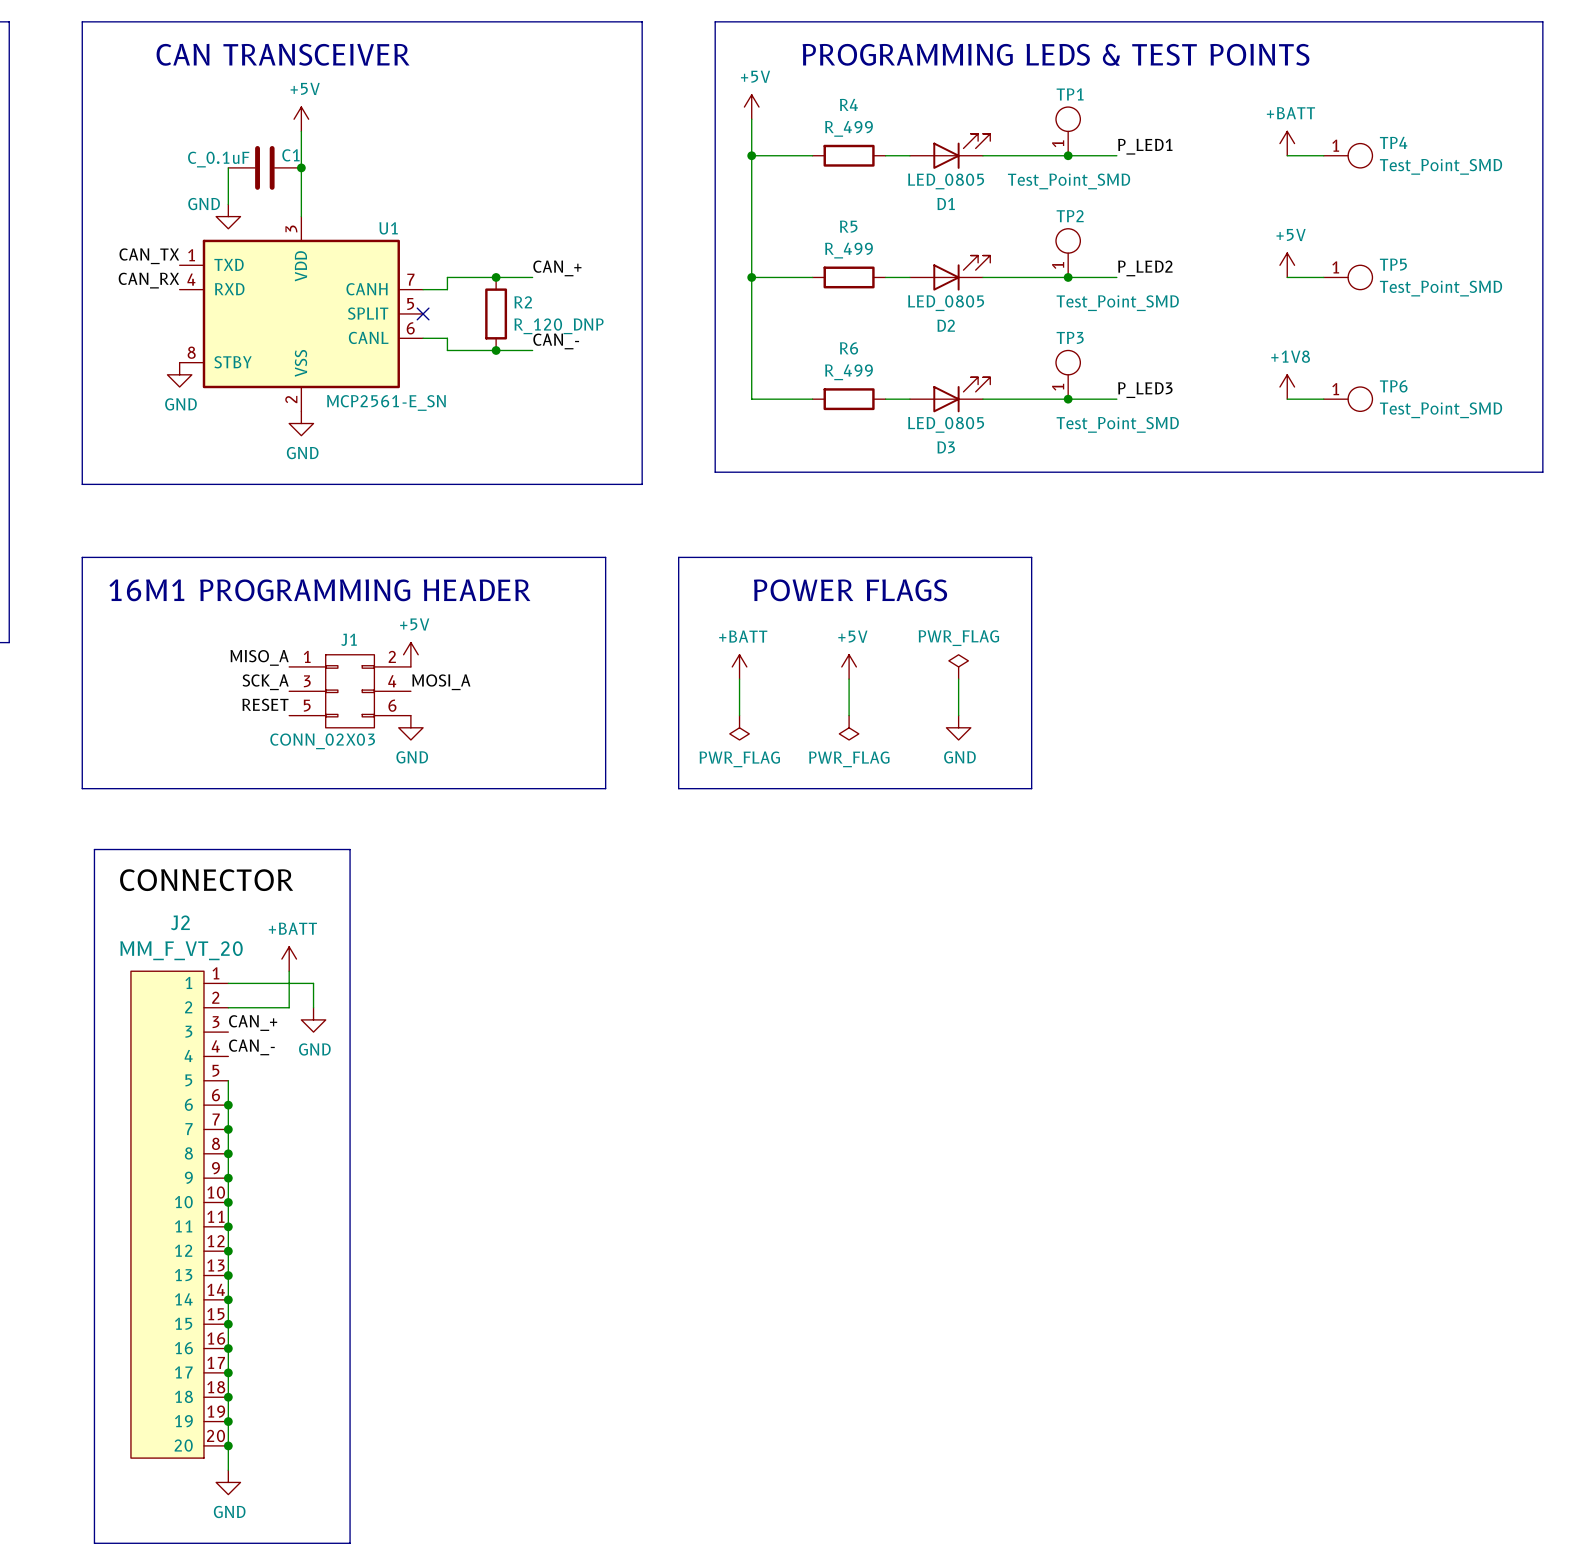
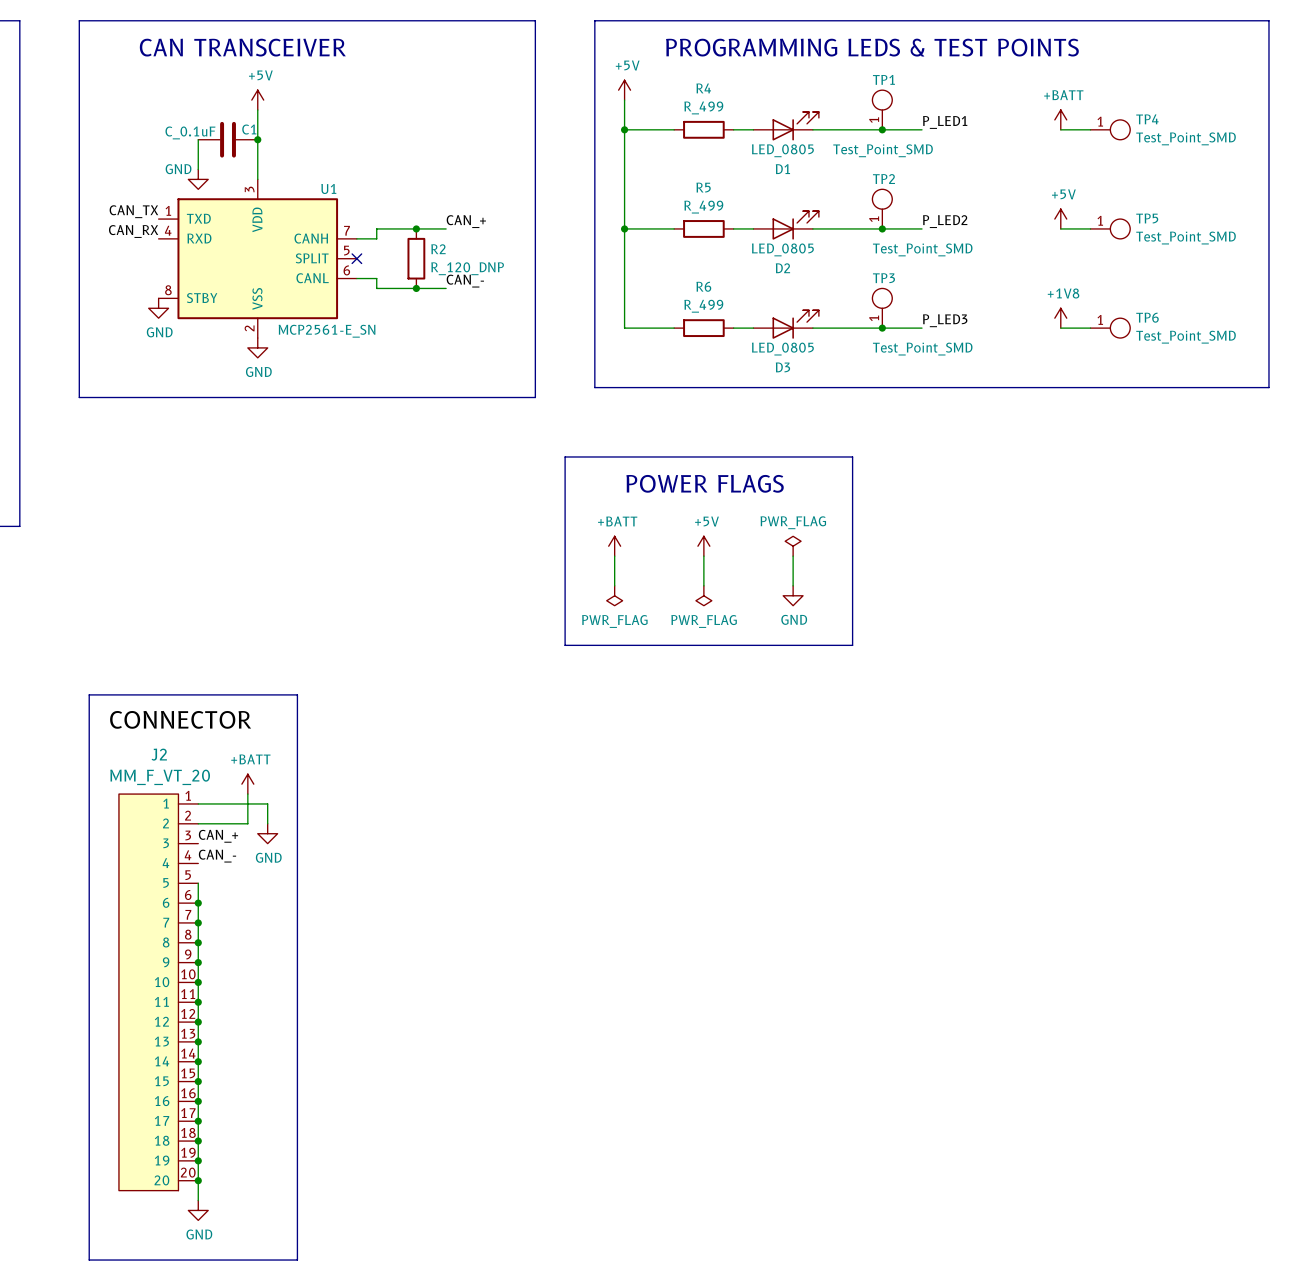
line: (82, 557) (605, 557) (605, 788) (82, 788) (82, 557) -> none
text: 16M1 PROGRAMMING HEADER (319, 590) -> none
power symbol: +5V (410, 654) -> none
label: MISO_A (259, 657) -> none
label: SCK_A (265, 682) -> none
label: MOSI_A (441, 682) -> none
J1: CONN_02X03 (350, 691) -> none
label: RESET (265, 704) -> none
power symbol: GND (410, 727) -> none

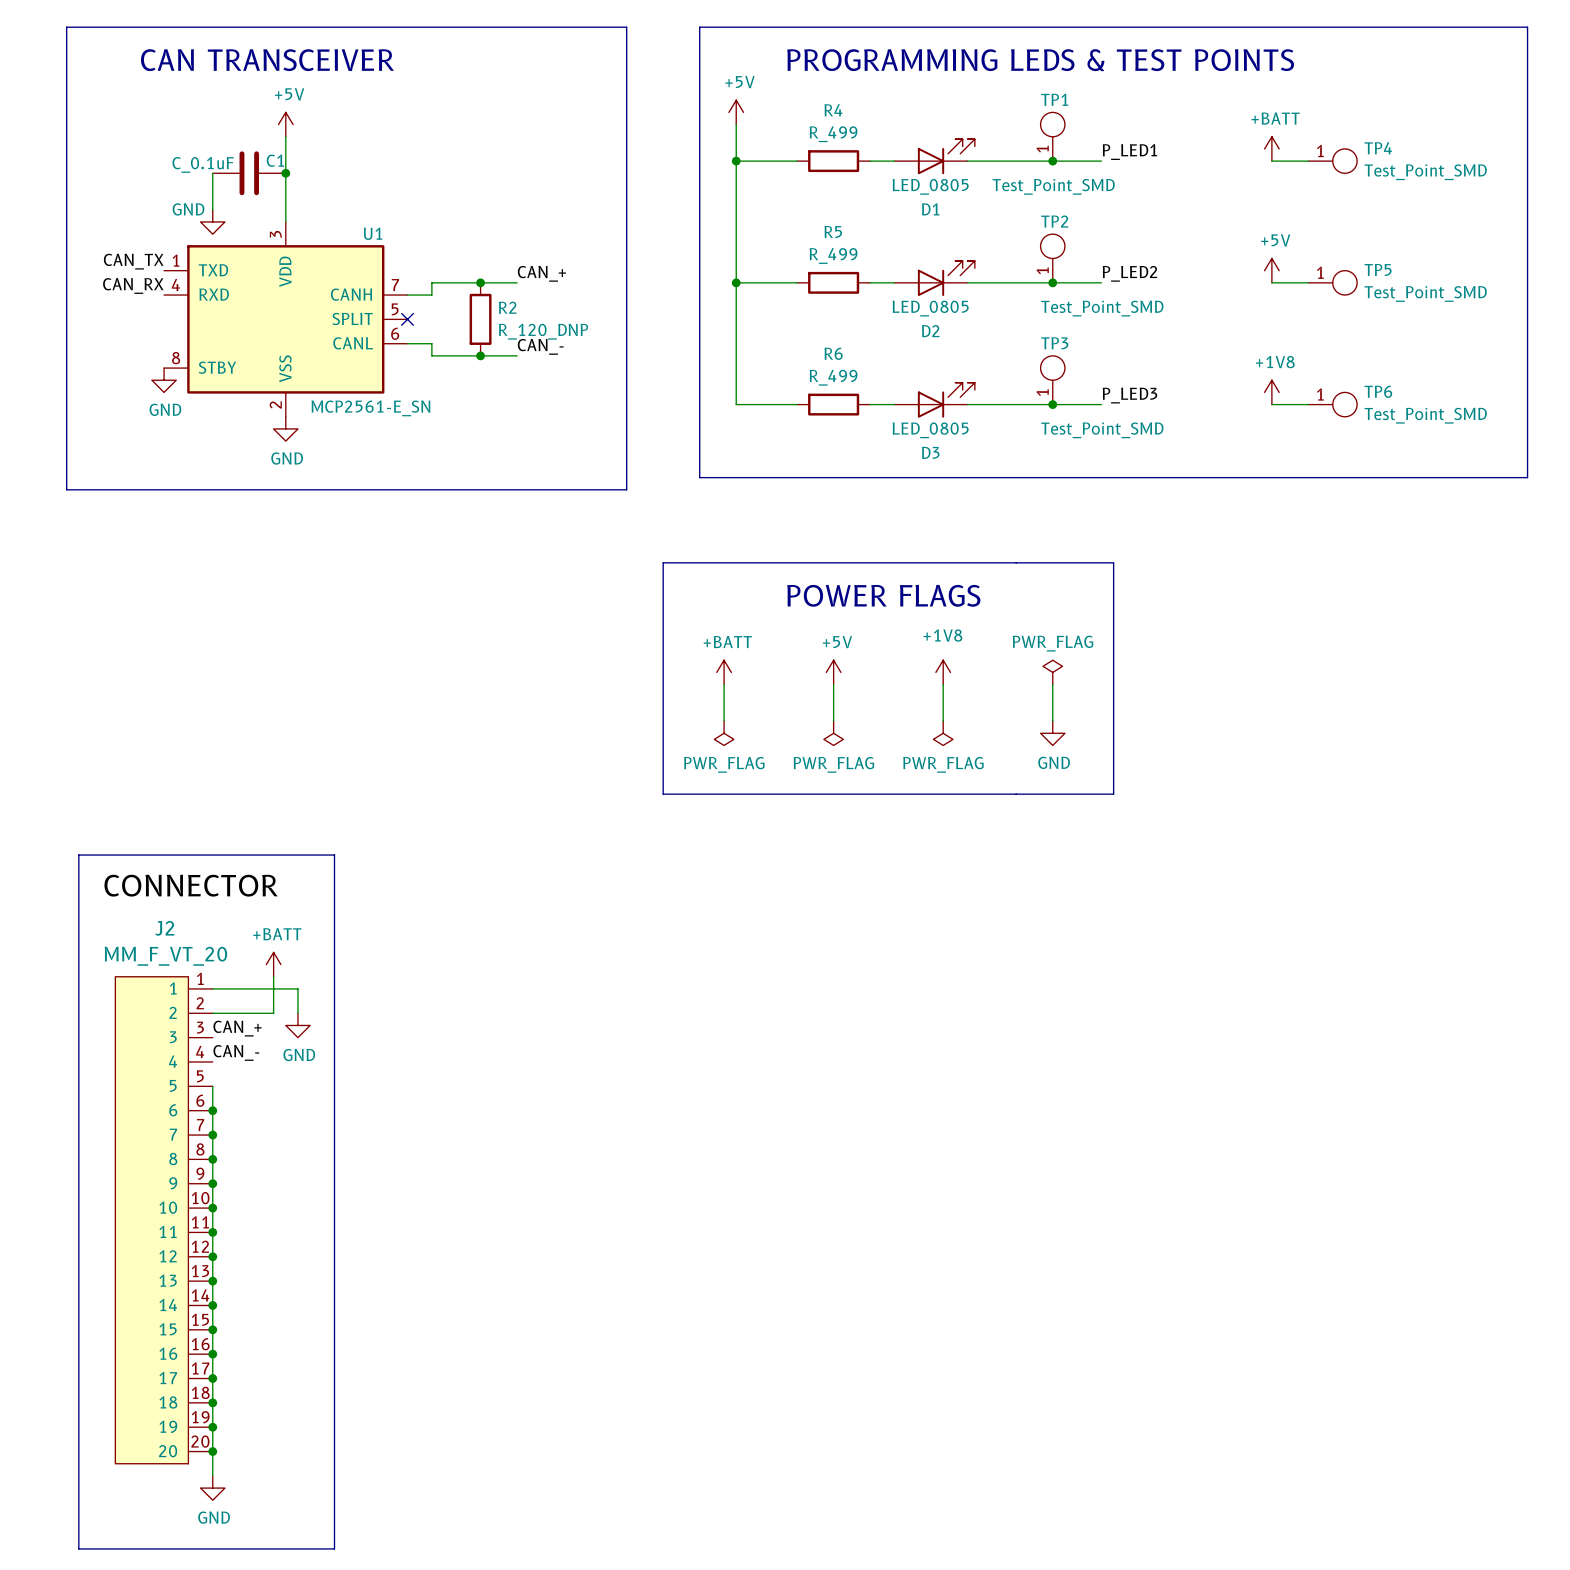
line: (852, 456) (852, 645) -> (1016, 562) (1113, 562) (1113, 794) (1016, 794)
text position: POWER FLAGS (705, 483) -> POWER FLAGS (883, 595)
power symbol: PWR_FLAG (793, 546) -> +1V8 (943, 672)
power symbol: none -> PWR_FLAG (1052, 672)
wire: none -> (1052, 684) (1052, 721)
power symbol: GND (793, 595) -> PWR_FLAG (943, 733)
power symbol: none -> GND (1052, 733)

